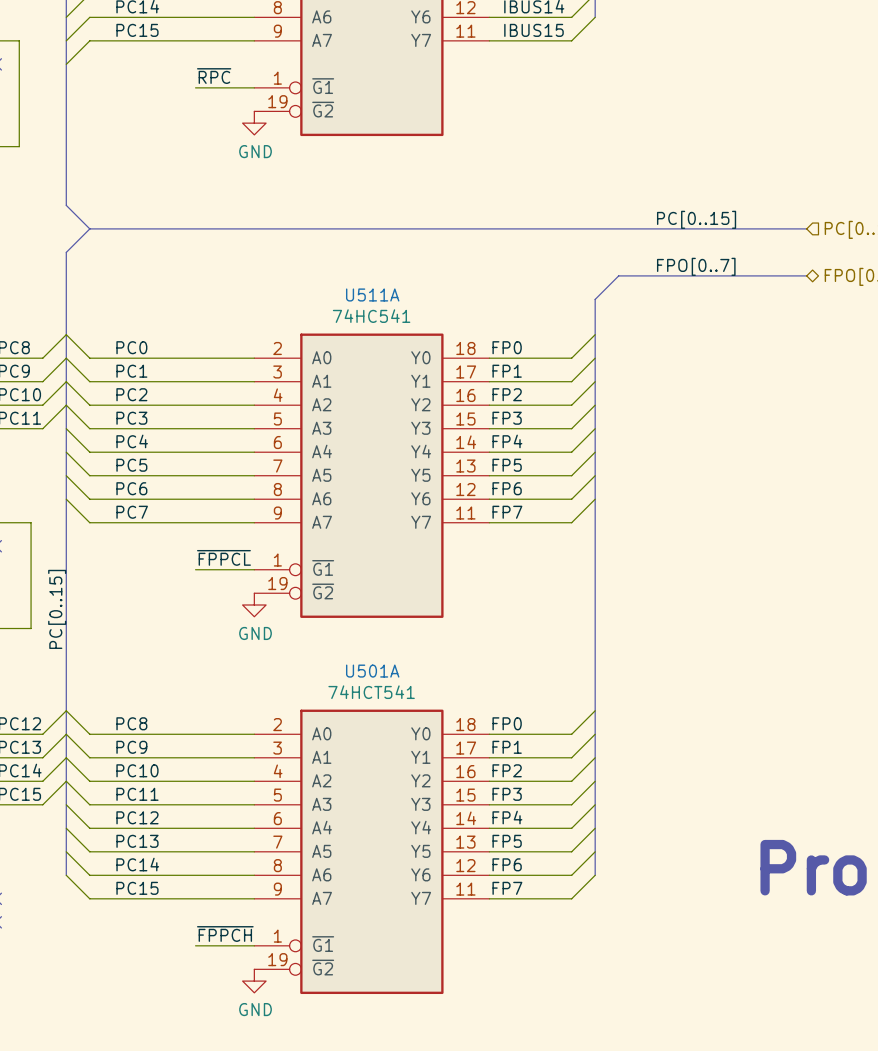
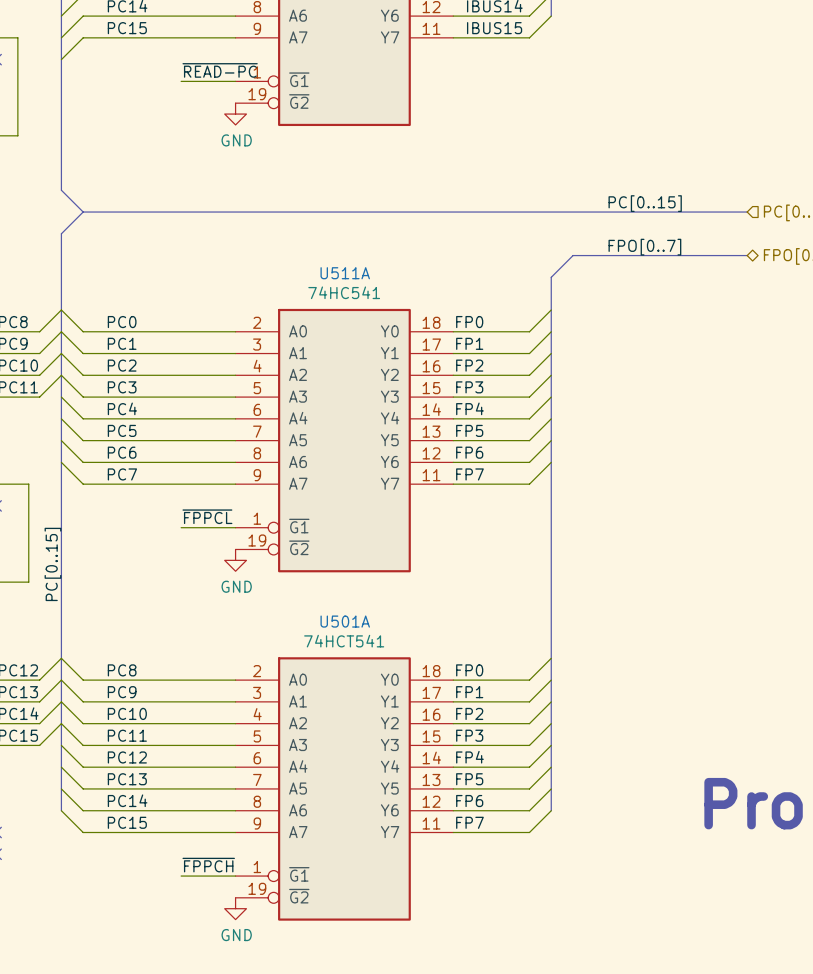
label: ~{RPC} (214, 76) -> ~{READ-PC} (220, 70)

